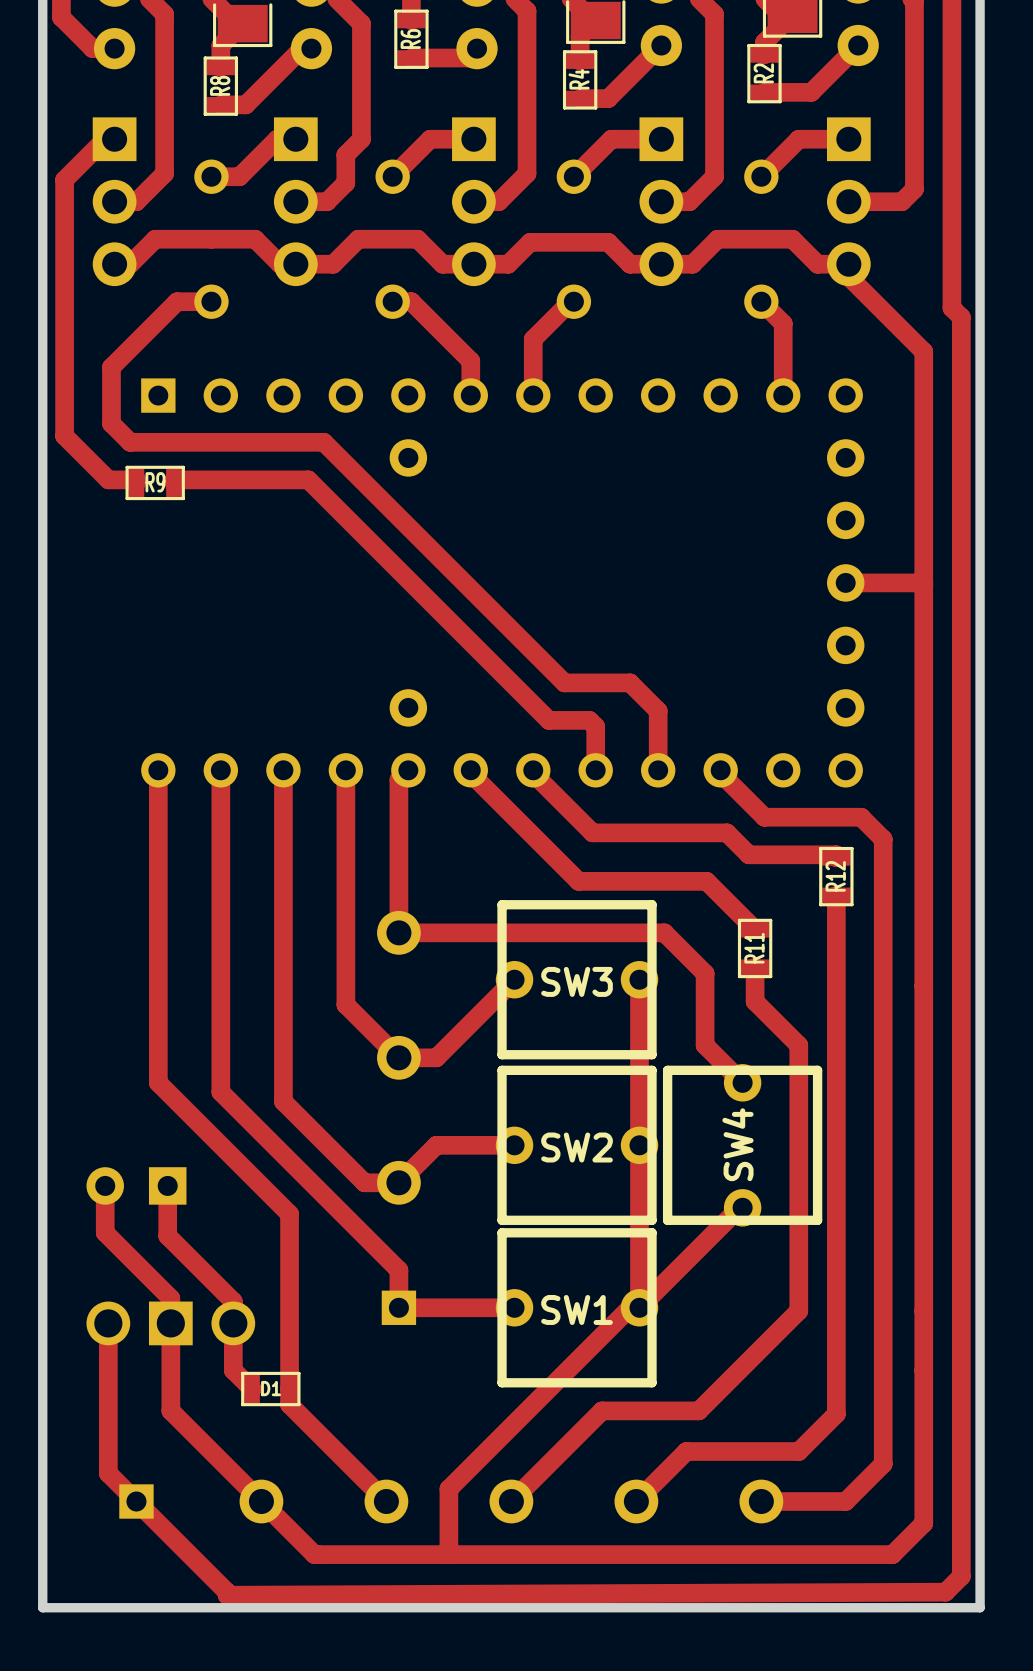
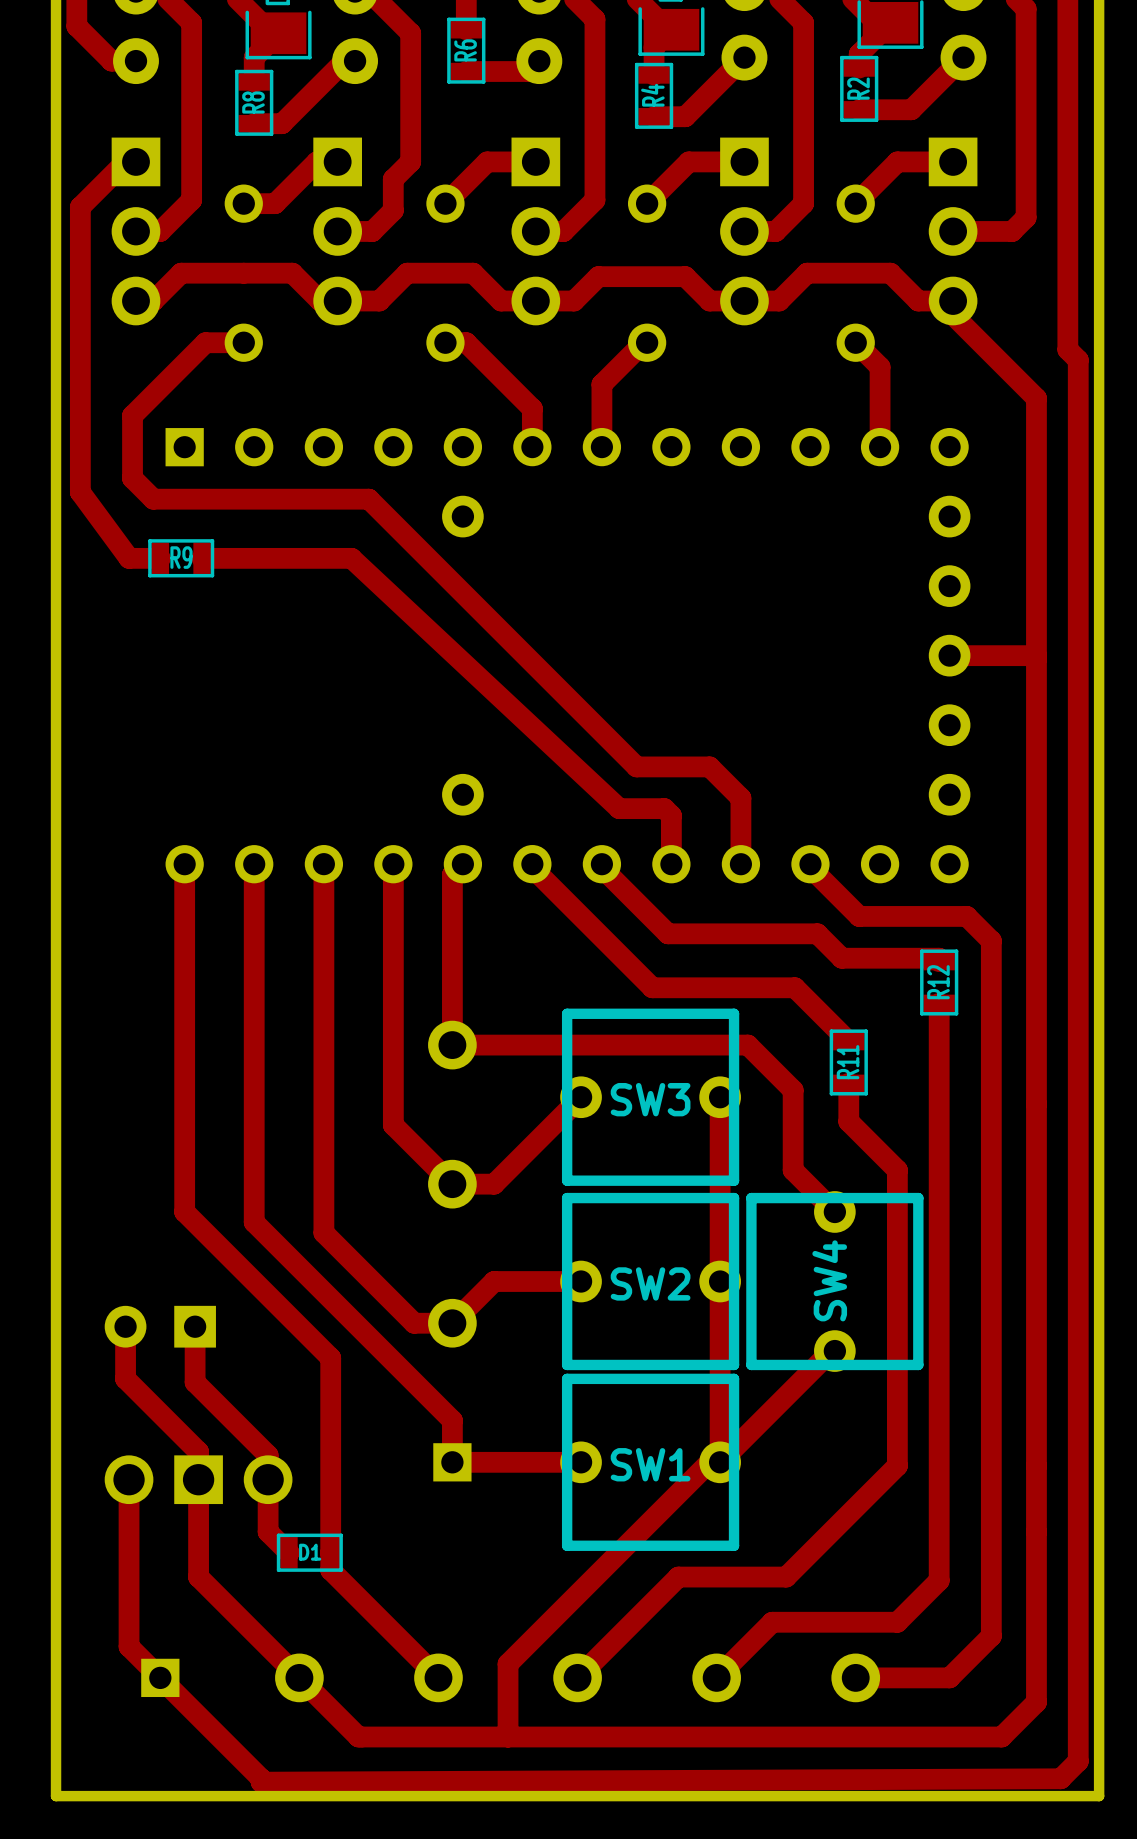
top track: (64, 436) (108, 479) (136, 479) (136, 482) -> (80, 492) (129, 558) (160, 558)
R9 position: (155, 482) -> (181, 558)
top track: (173, 482) (173, 479) (308, 479) (548, 720) -> (202, 558) (351, 558) (619, 808)

